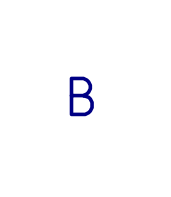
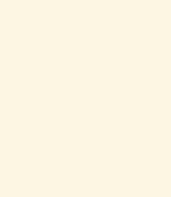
text: B (81, 96) -> none

